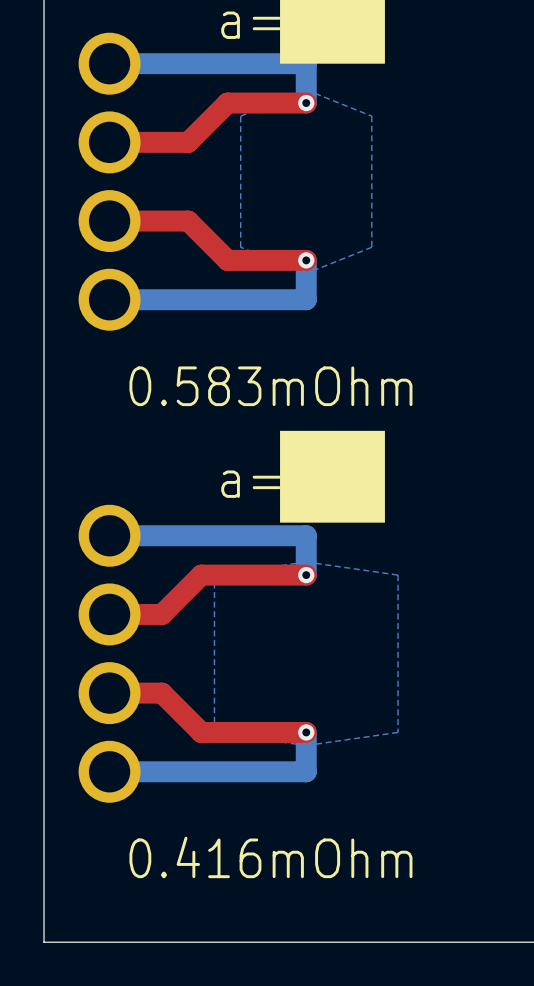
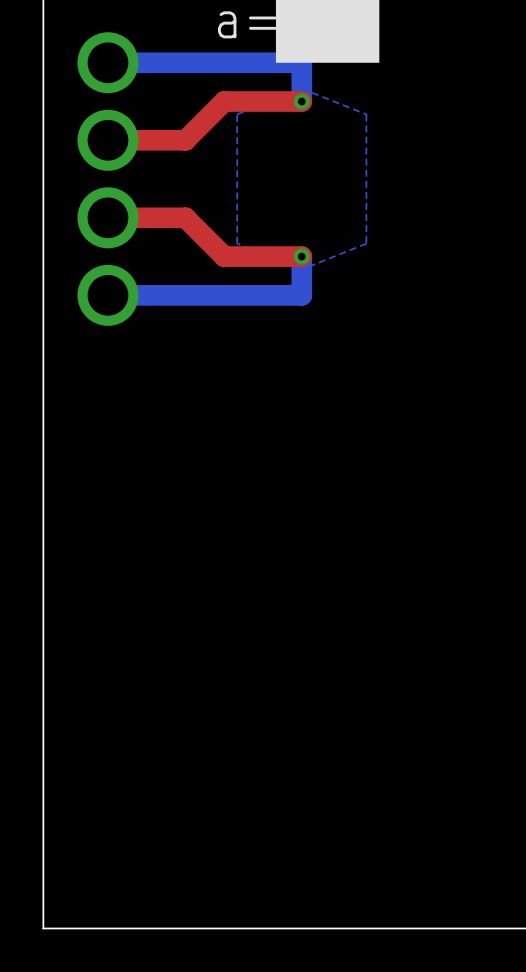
text: 0.583mOhm (270, 386) -> none
drawing: [280, 430, 385, 523] -> none
text: a= (251, 484) -> none
bottom track: (109, 535) (306, 535) (306, 575) -> none
part: (109, 535) -> none
bottom zone outline: (306, 561) (398, 575) (398, 732) (306, 745) (214, 732) (214, 575) (306, 561) -> none
top track: (306, 575) (201, 575) (162, 614) (109, 614) -> none
via: (306, 575) -> none
part: (109, 614) -> none
top track: (109, 693) (162, 693) (201, 732) (306, 732) -> none
part: (109, 693) -> none
bottom track: (306, 732) (306, 771) (109, 771) -> none
via: (306, 732) -> none
part: (109, 771) -> none
text: 0.416mOhm (270, 857) -> none

